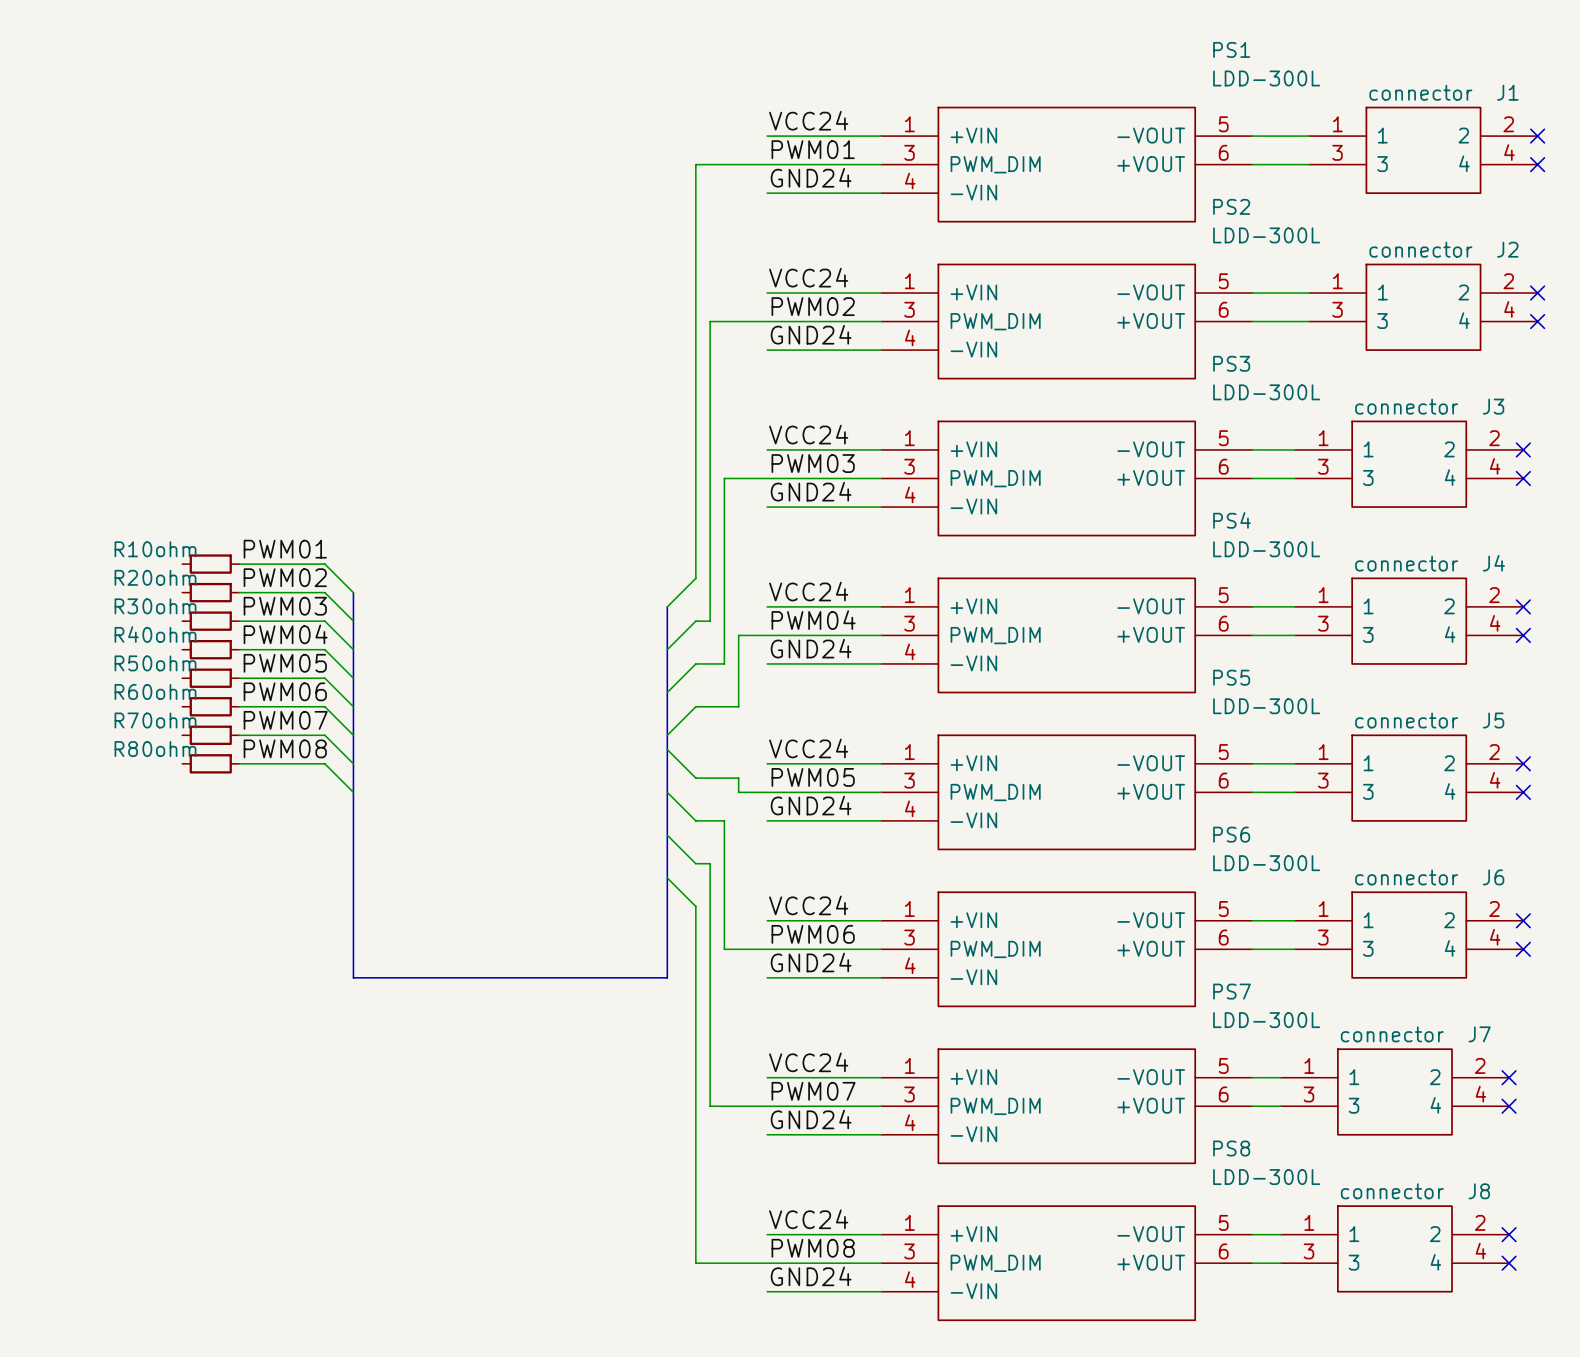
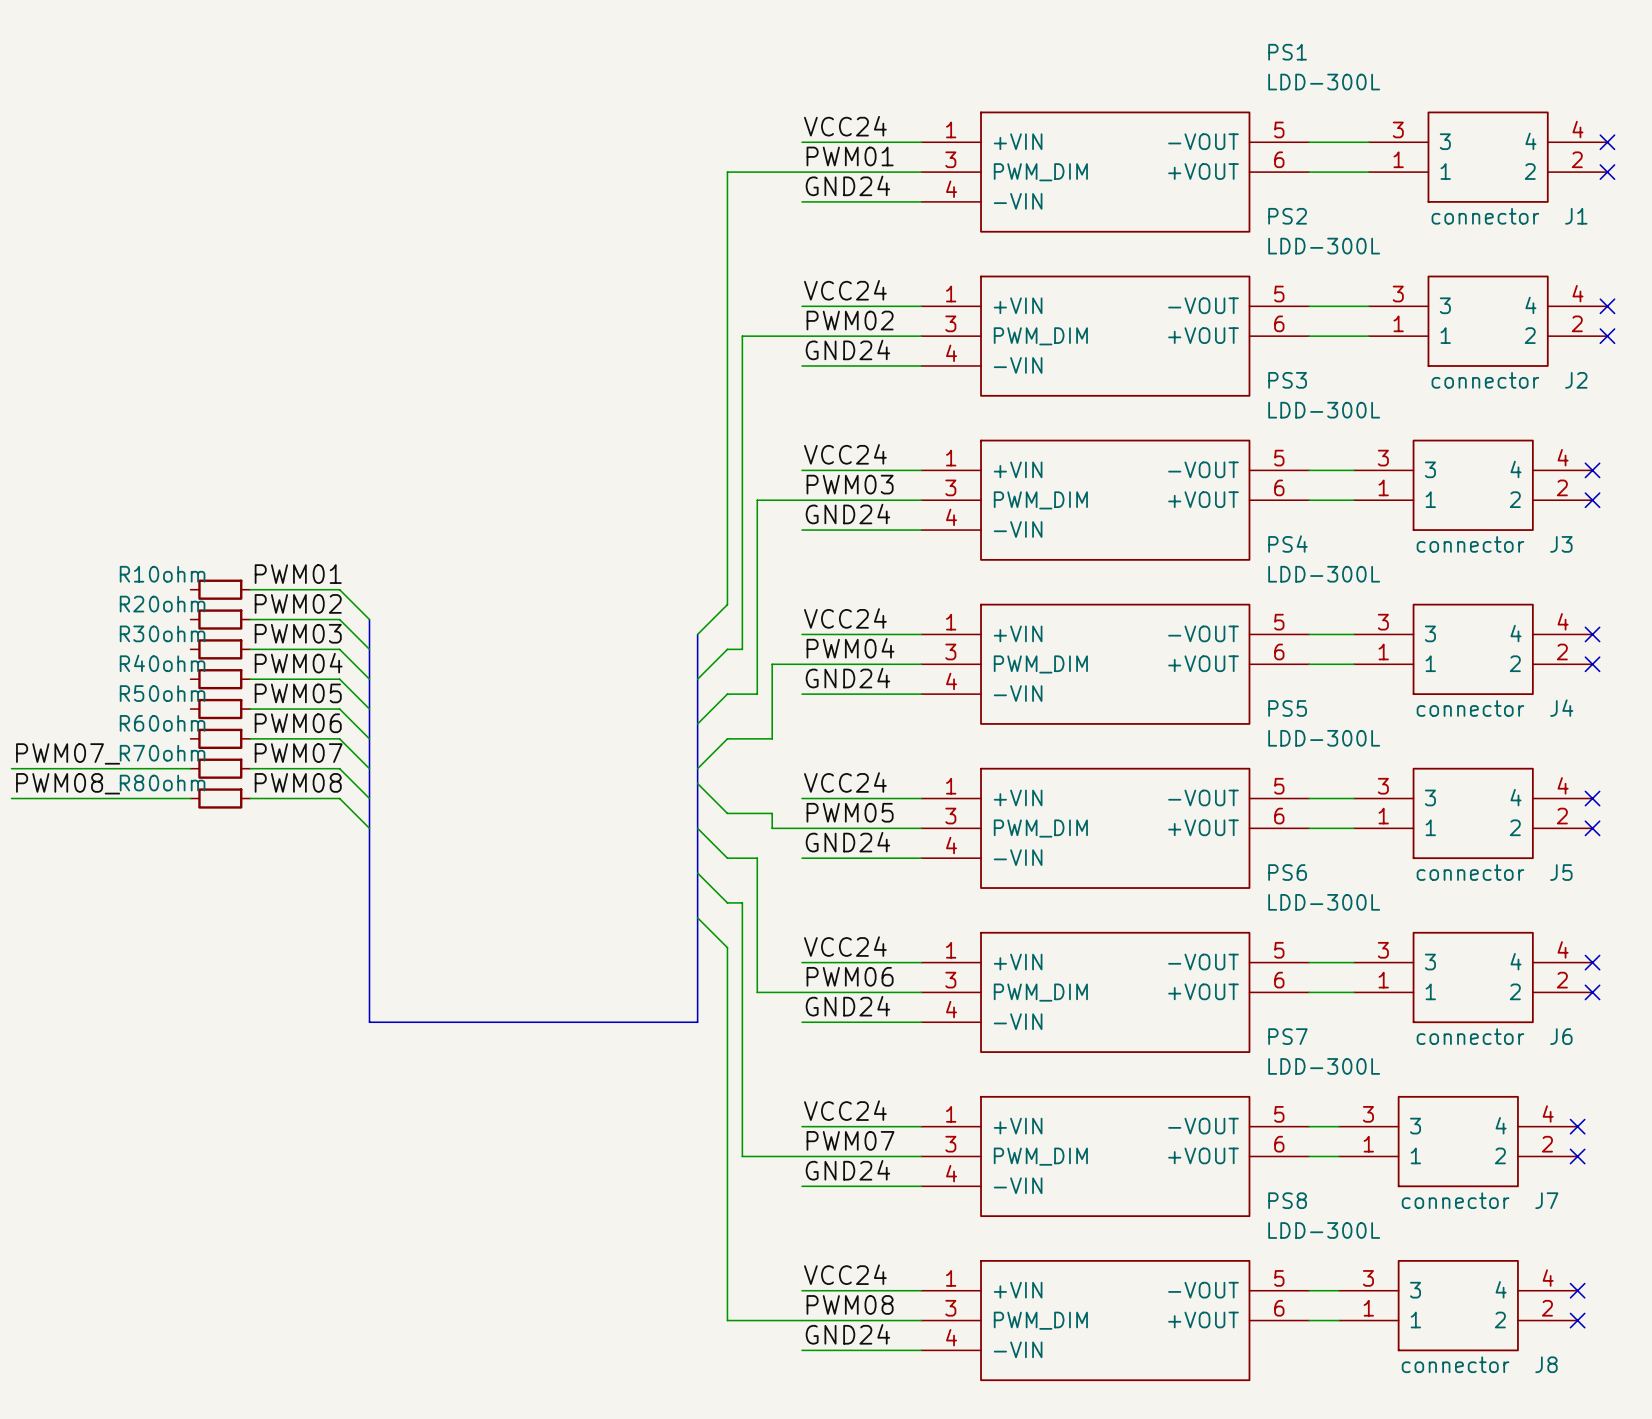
J1 flip: as is (1423, 150) -> up-down (1488, 157)
J2 flip: as is (1423, 307) -> up-down (1488, 321)
J3 flip: as is (1409, 464) -> up-down (1473, 485)
J4 flip: as is (1409, 621) -> up-down (1473, 649)
label: none -> PWM07_ (68, 753)
wire: none -> (11, 768) (190, 768)
label: none -> PWM08_ (68, 783)
wire: none -> (11, 798) (190, 798)
J5 flip: as is (1409, 778) -> up-down (1473, 813)
J6 flip: as is (1409, 935) -> up-down (1473, 977)
J7 flip: as is (1394, 1091) -> up-down (1458, 1141)
J8 flip: as is (1394, 1248) -> up-down (1458, 1305)

